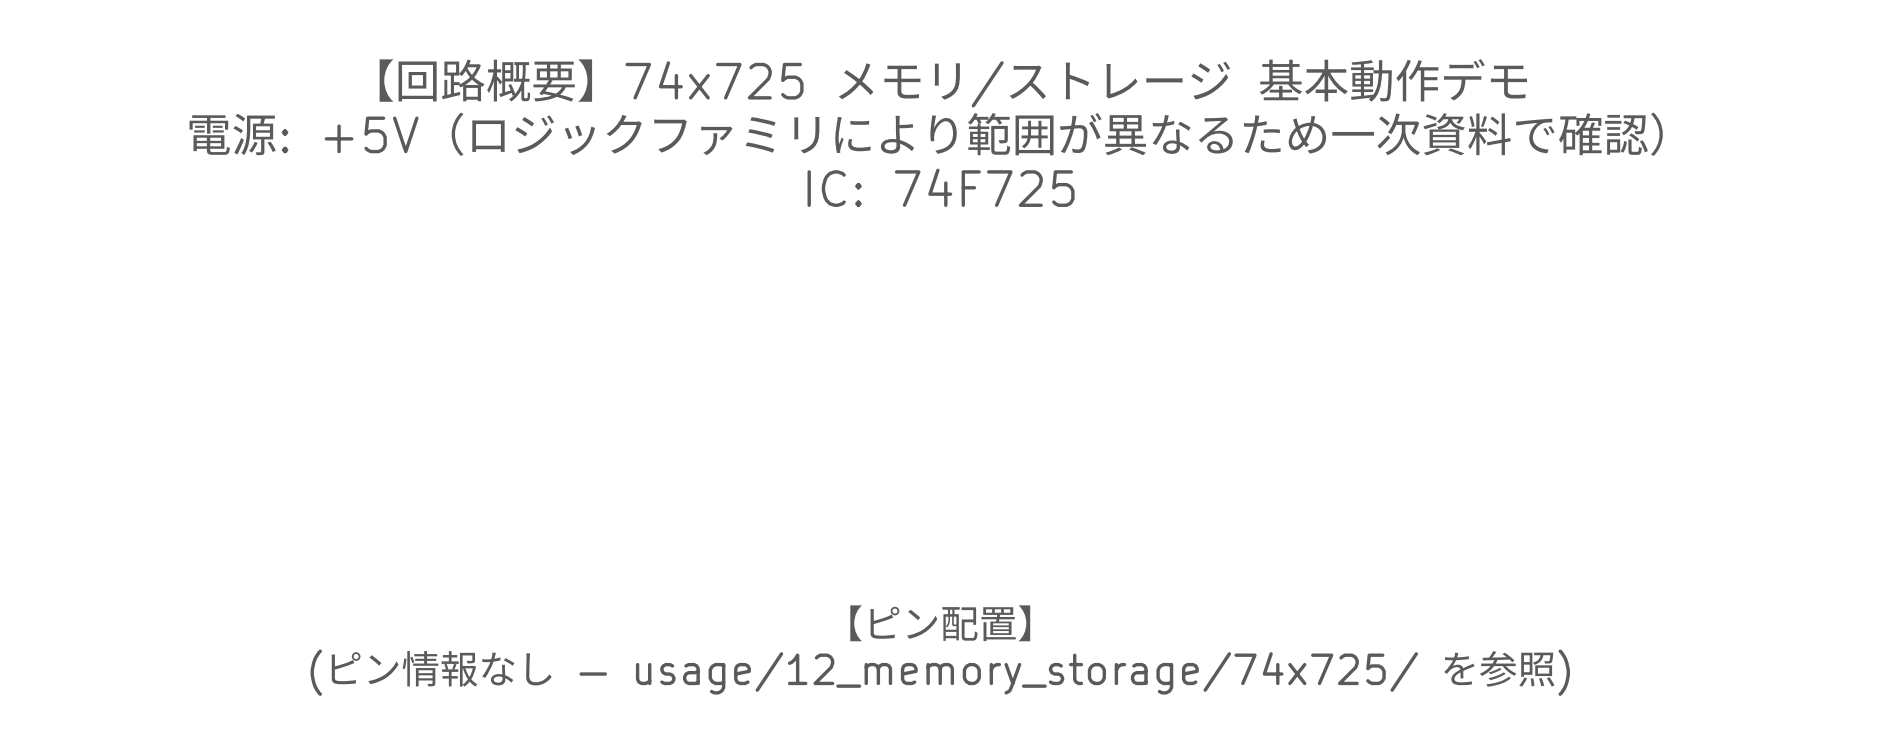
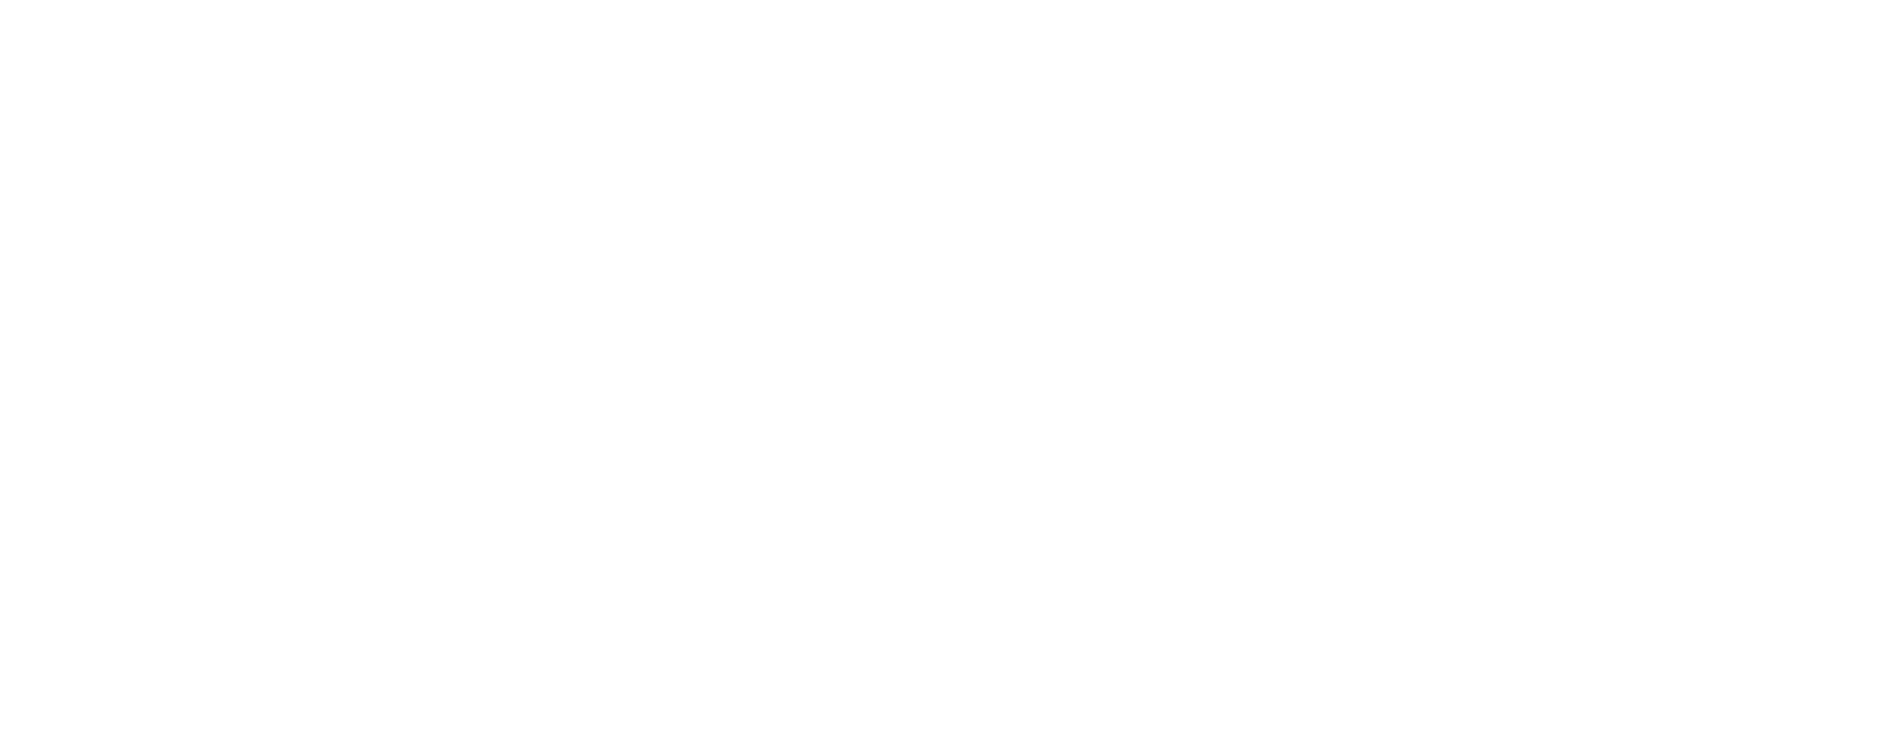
text: 【回路概要】74x725 メモリ/ストレージ 基本動作デモ (953, 82) -> none
text: 電源: +5V（ロジックファミリにより範囲が異なるため一次資料で確認） (926, 134) -> none
text: IC: 74F725 (941, 187) -> none
text: 【ピン配置】 (940, 623) -> none
text: (ピン情報なし — usage/12_memory_storage/74x725/ を参照) (940, 672) -> none

